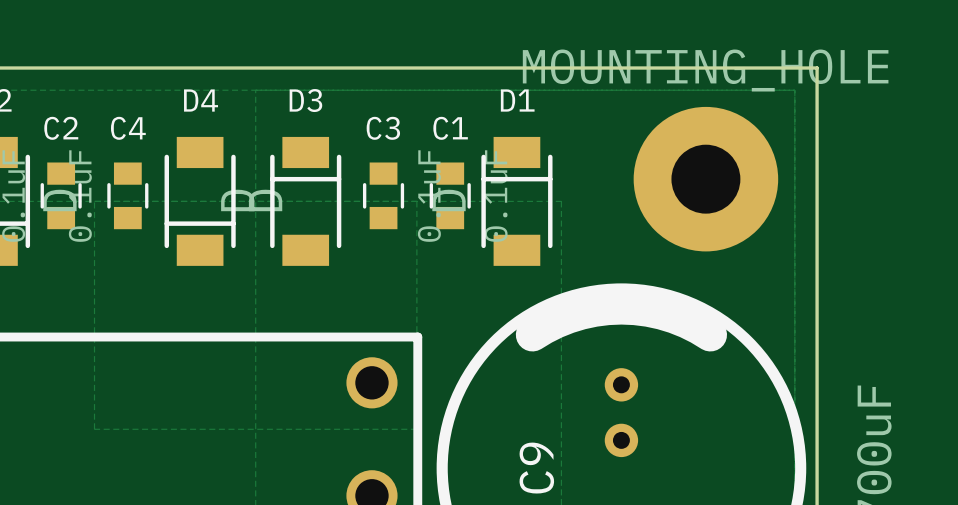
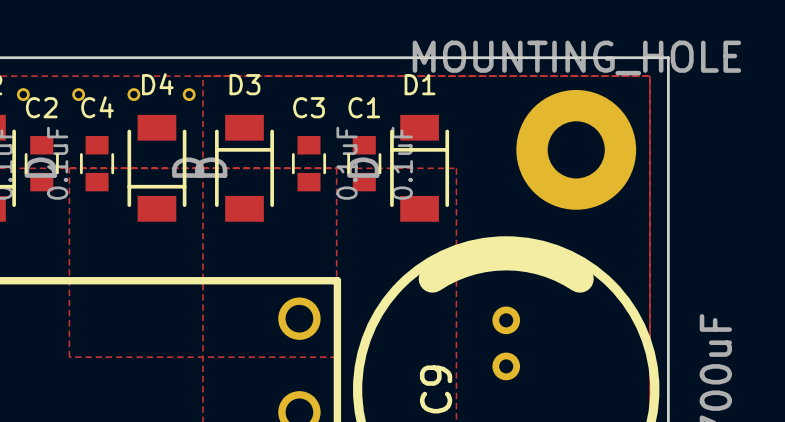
part: none -> (23, 94)
part: none -> (78, 94)
part: none -> (133, 94)
part: none -> (189, 94)

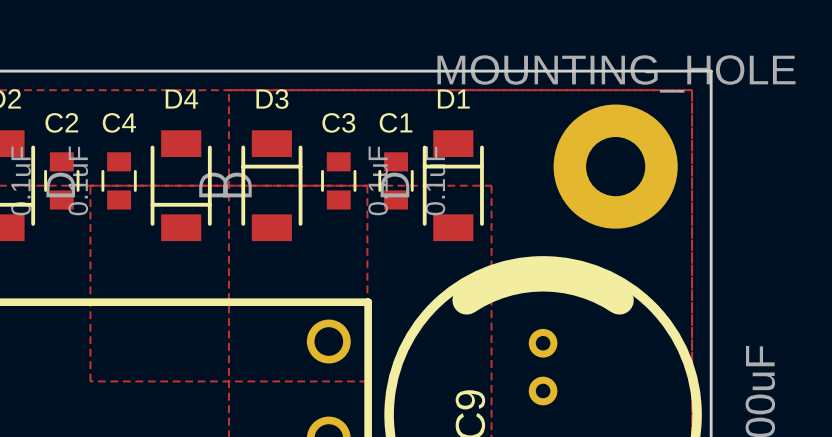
part: (23, 94) -> none
part: (78, 94) -> none
part: (133, 94) -> none
part: (189, 94) -> none

